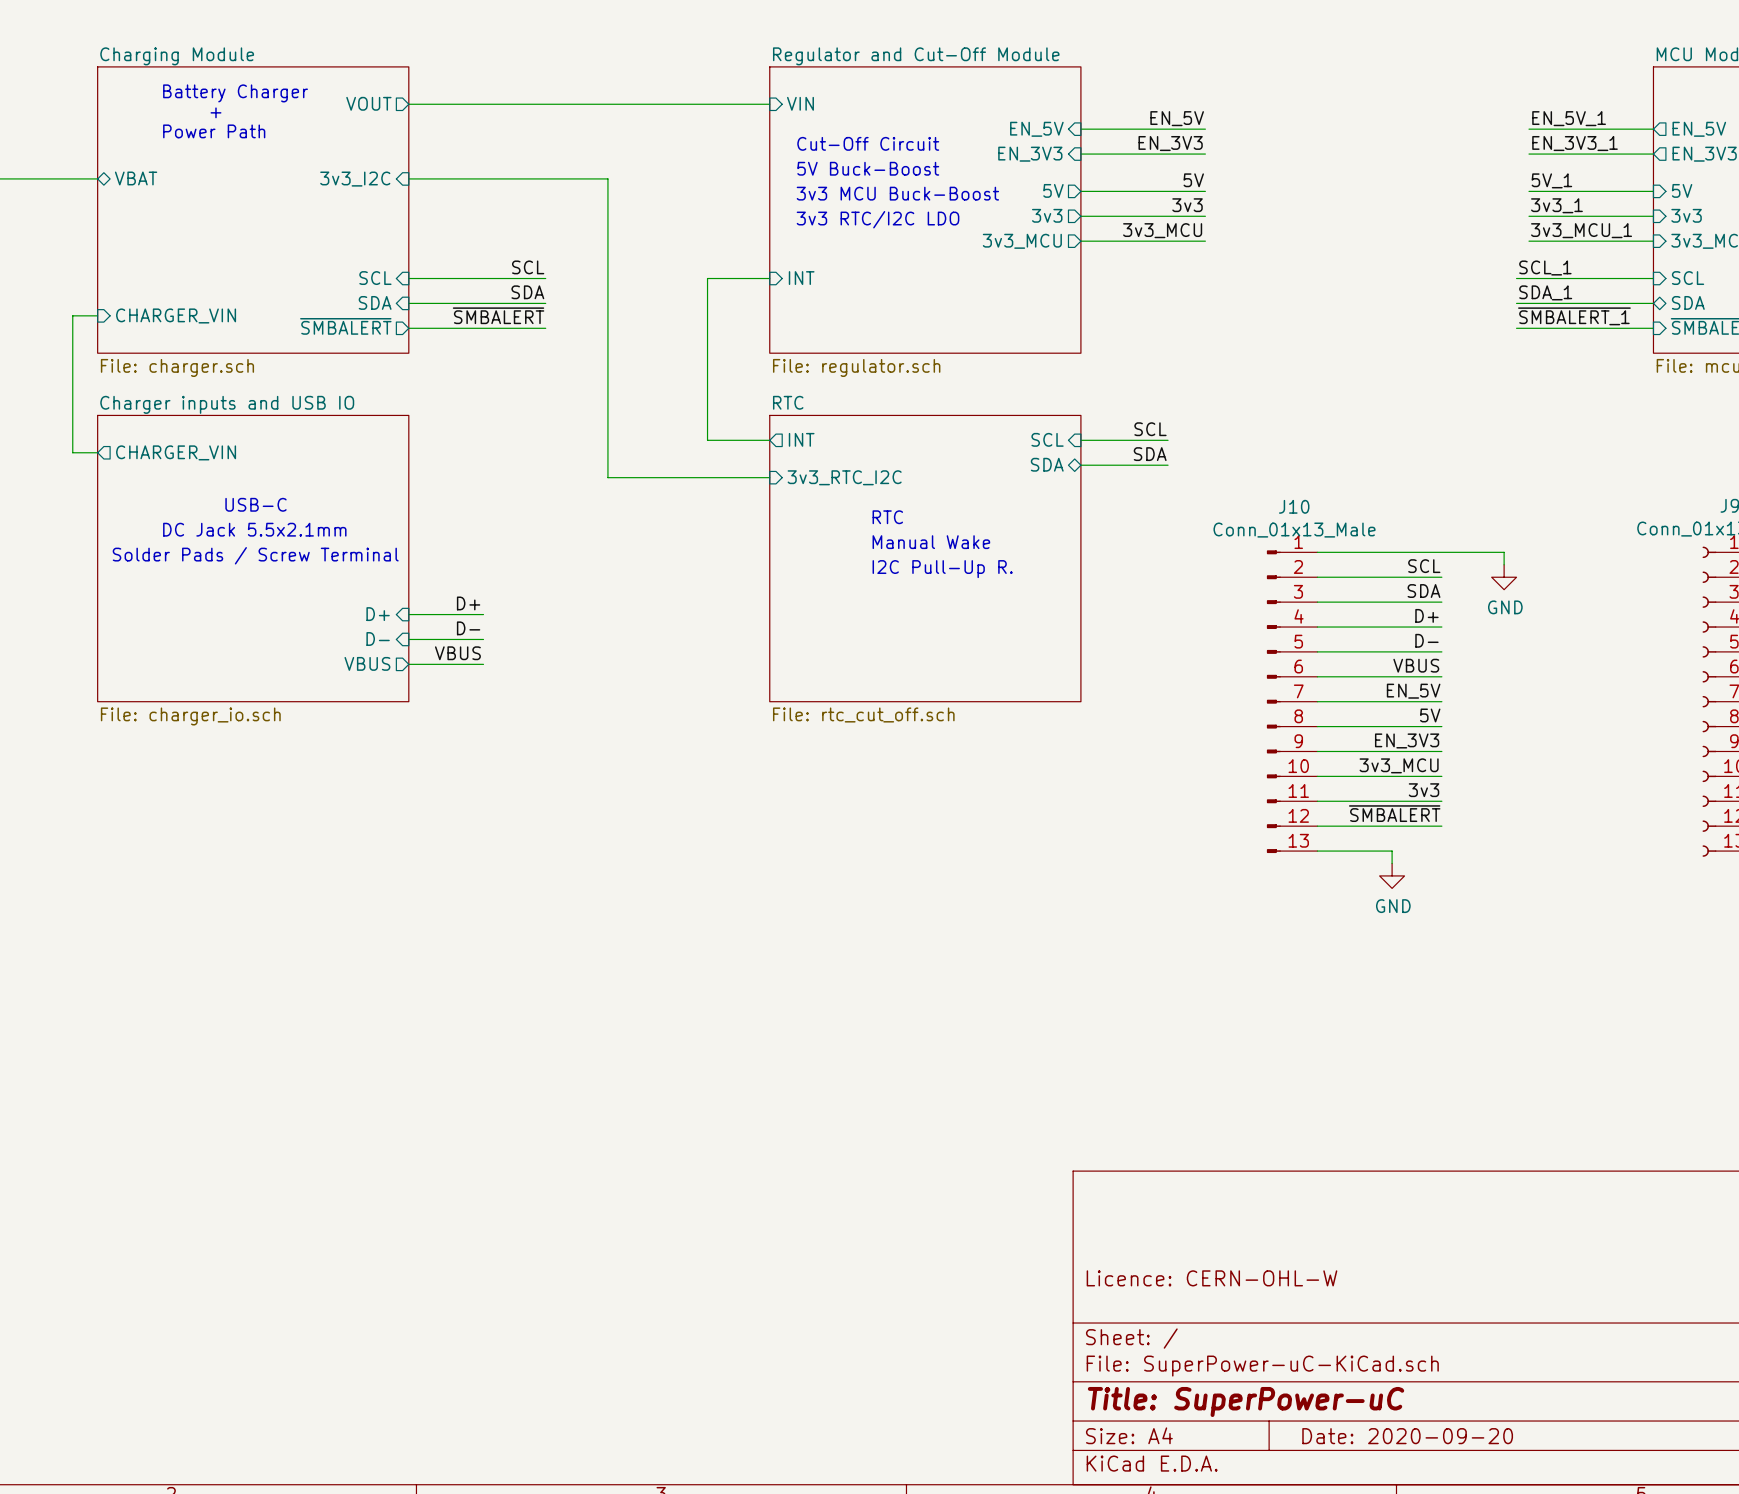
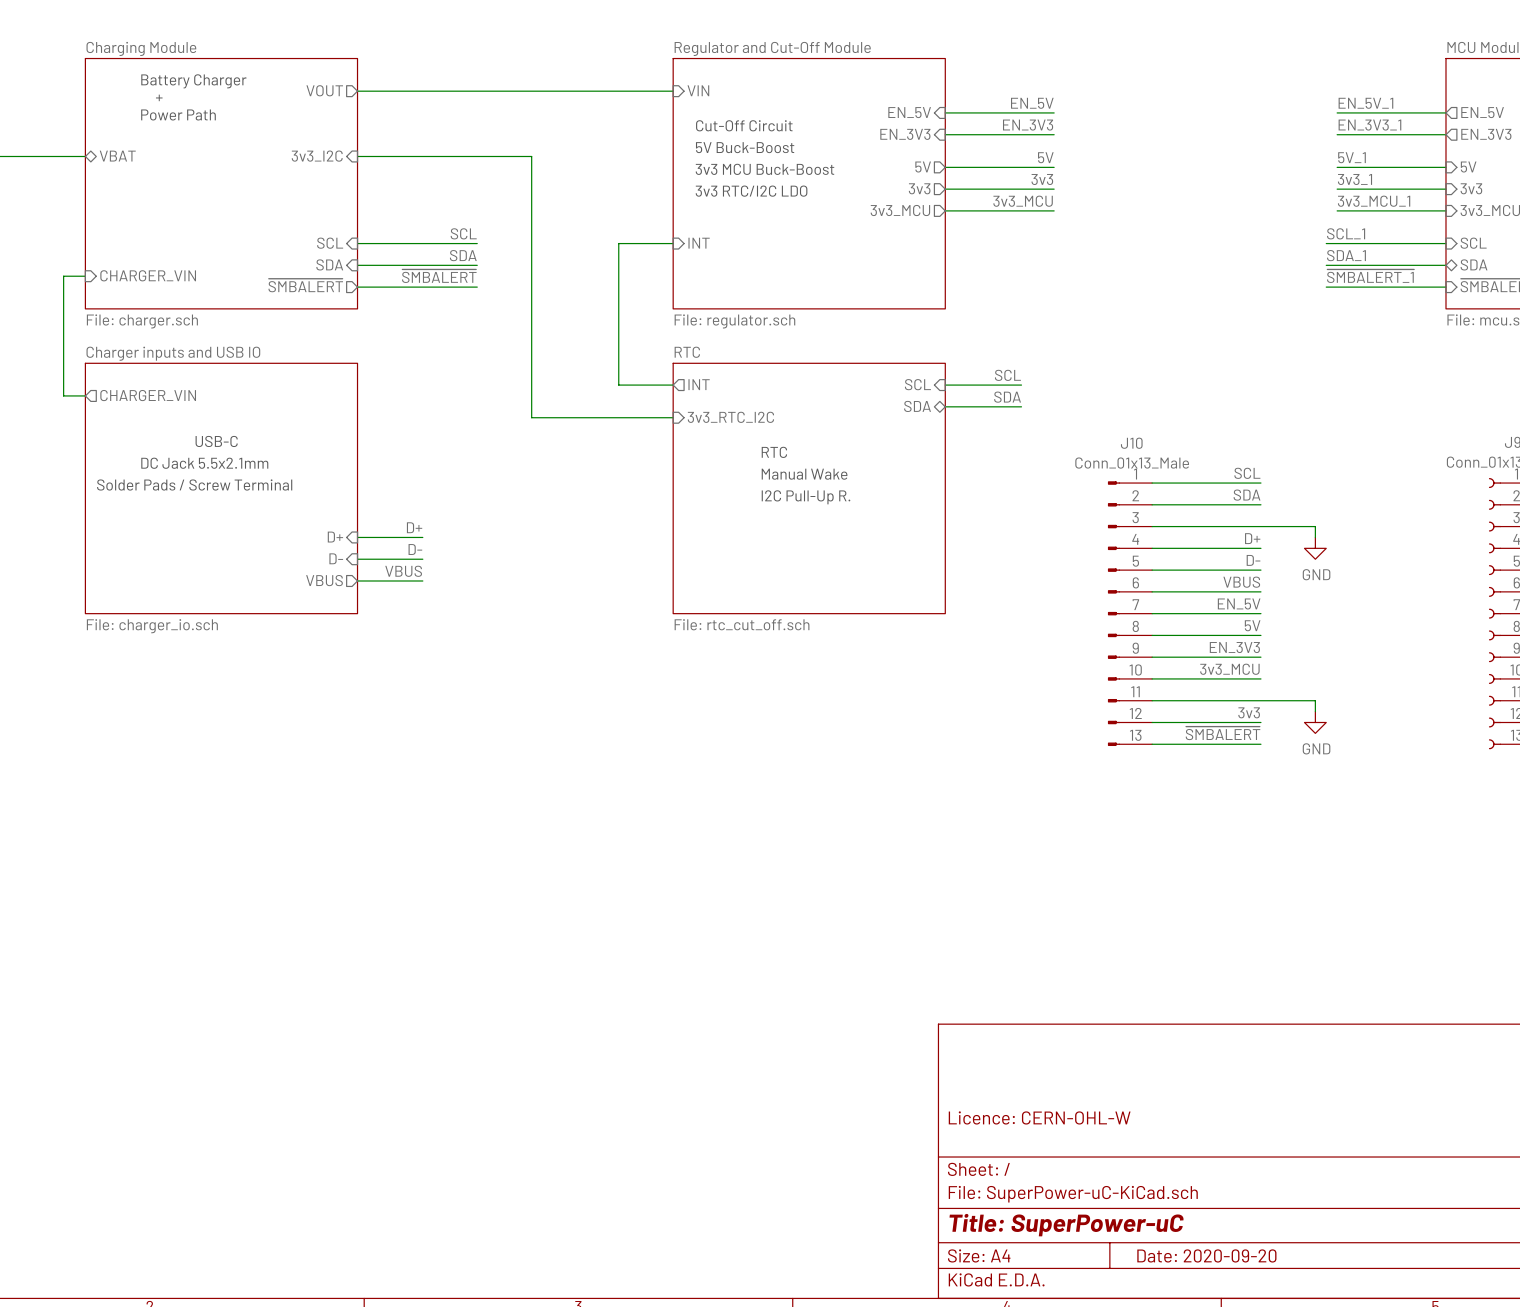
label: none -> SCL (1247, 473)
wire: (1441, 552) (1504, 552) (1504, 564) -> (1260, 526) (1315, 526) (1315, 537)
label: SCL (1424, 566) -> SDA (1247, 495)
power symbol position: GND (1504, 577) -> GND (1315, 548)
label: SDA (1424, 591) -> none
label: 3v3 (1424, 790) -> none
wire: none -> (1260, 700) (1315, 700) (1315, 711)
label: ~{SMBALERT} (1394, 813) -> 3v3 (1249, 712)
label: none -> ~{SMBALERT} (1223, 733)
wire: (1392, 851) (1392, 863) -> (1217, 744) (1260, 744)
power symbol position: GND (1392, 875) -> GND (1315, 722)

